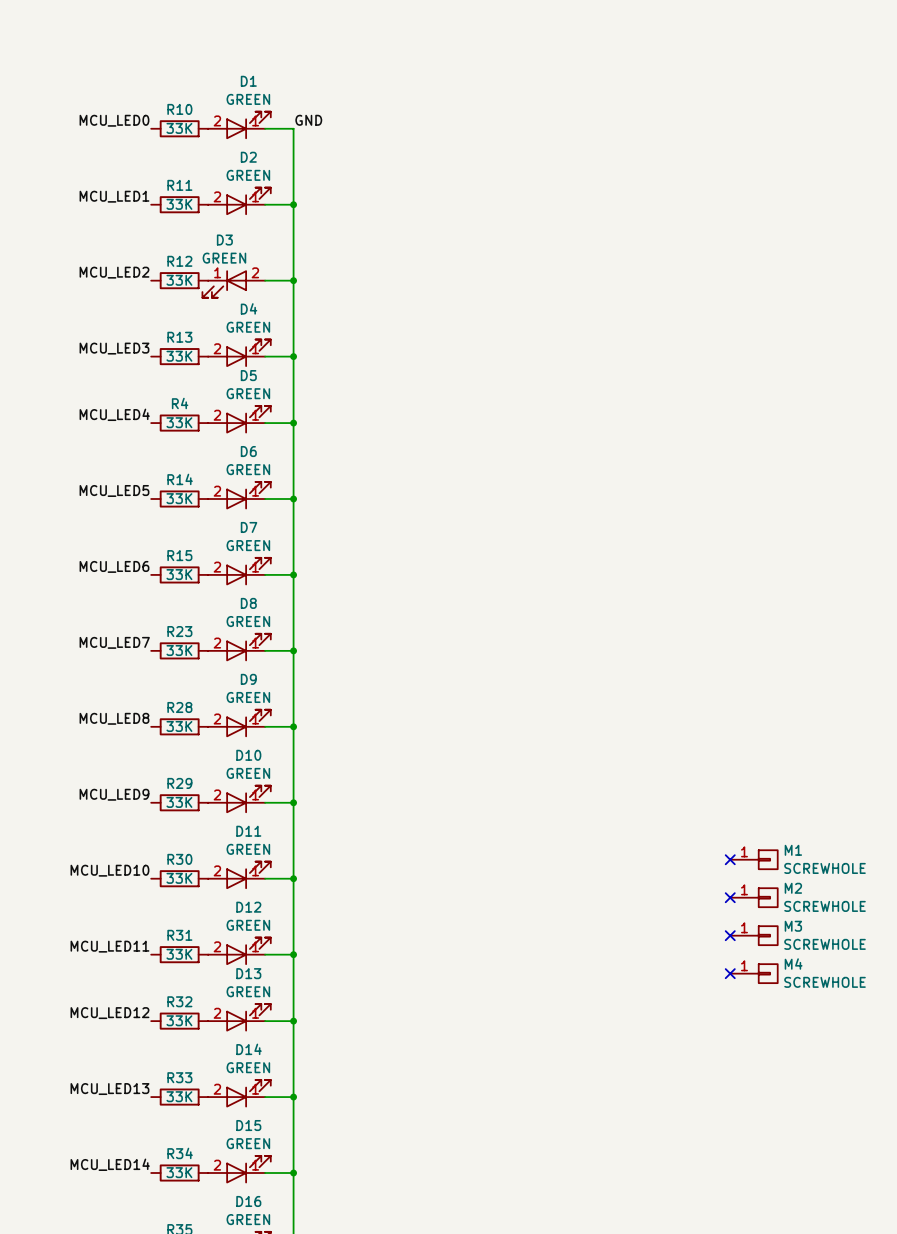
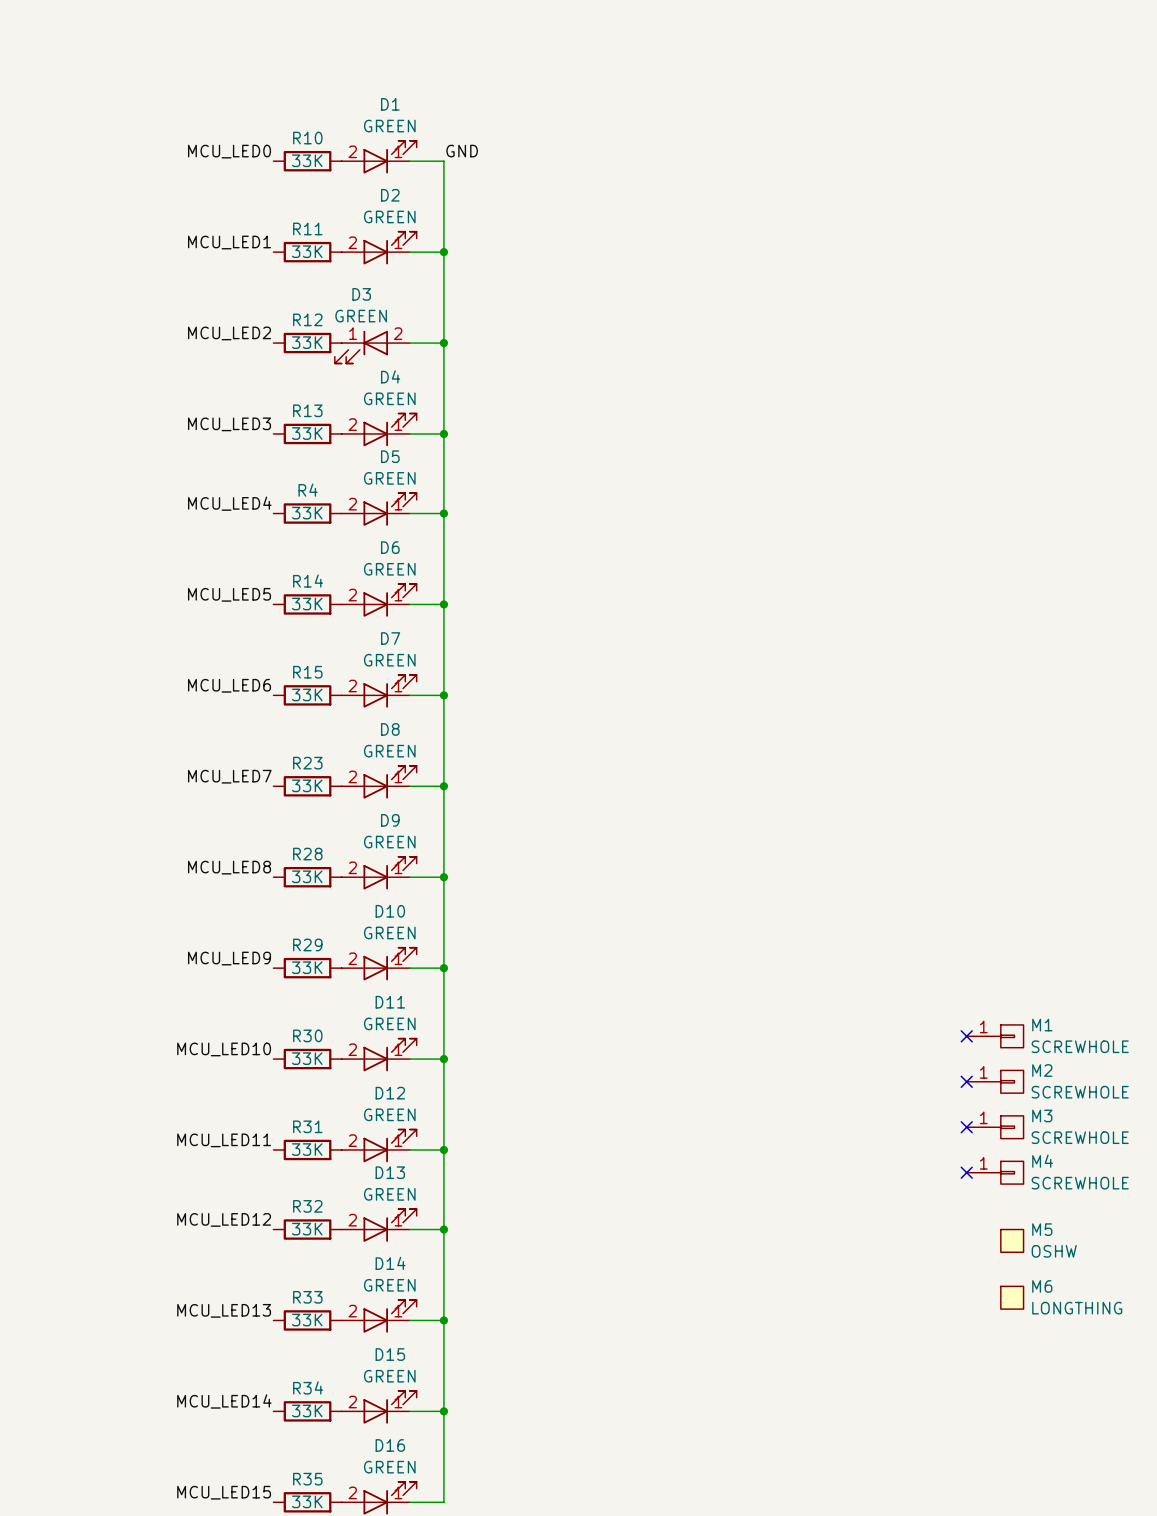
M5: none -> OSHW (1012, 1240)
M6: none -> LONGTHING (1012, 1297)

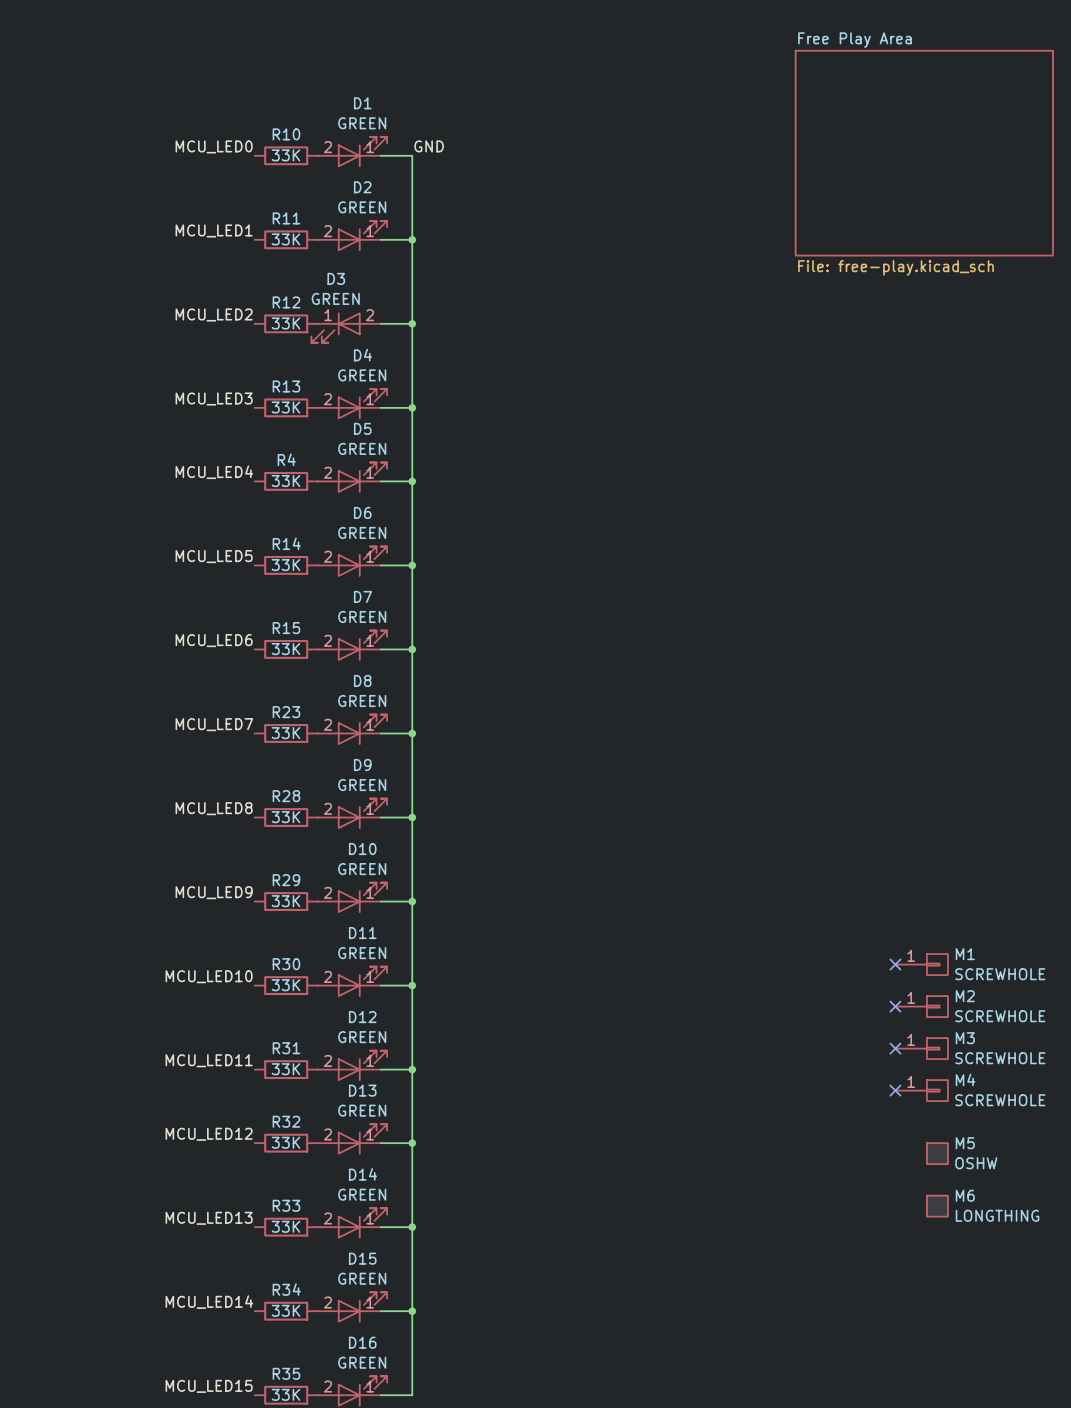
sheet Free Play Area: none -> File: free-play.kicad_sch (924, 153)

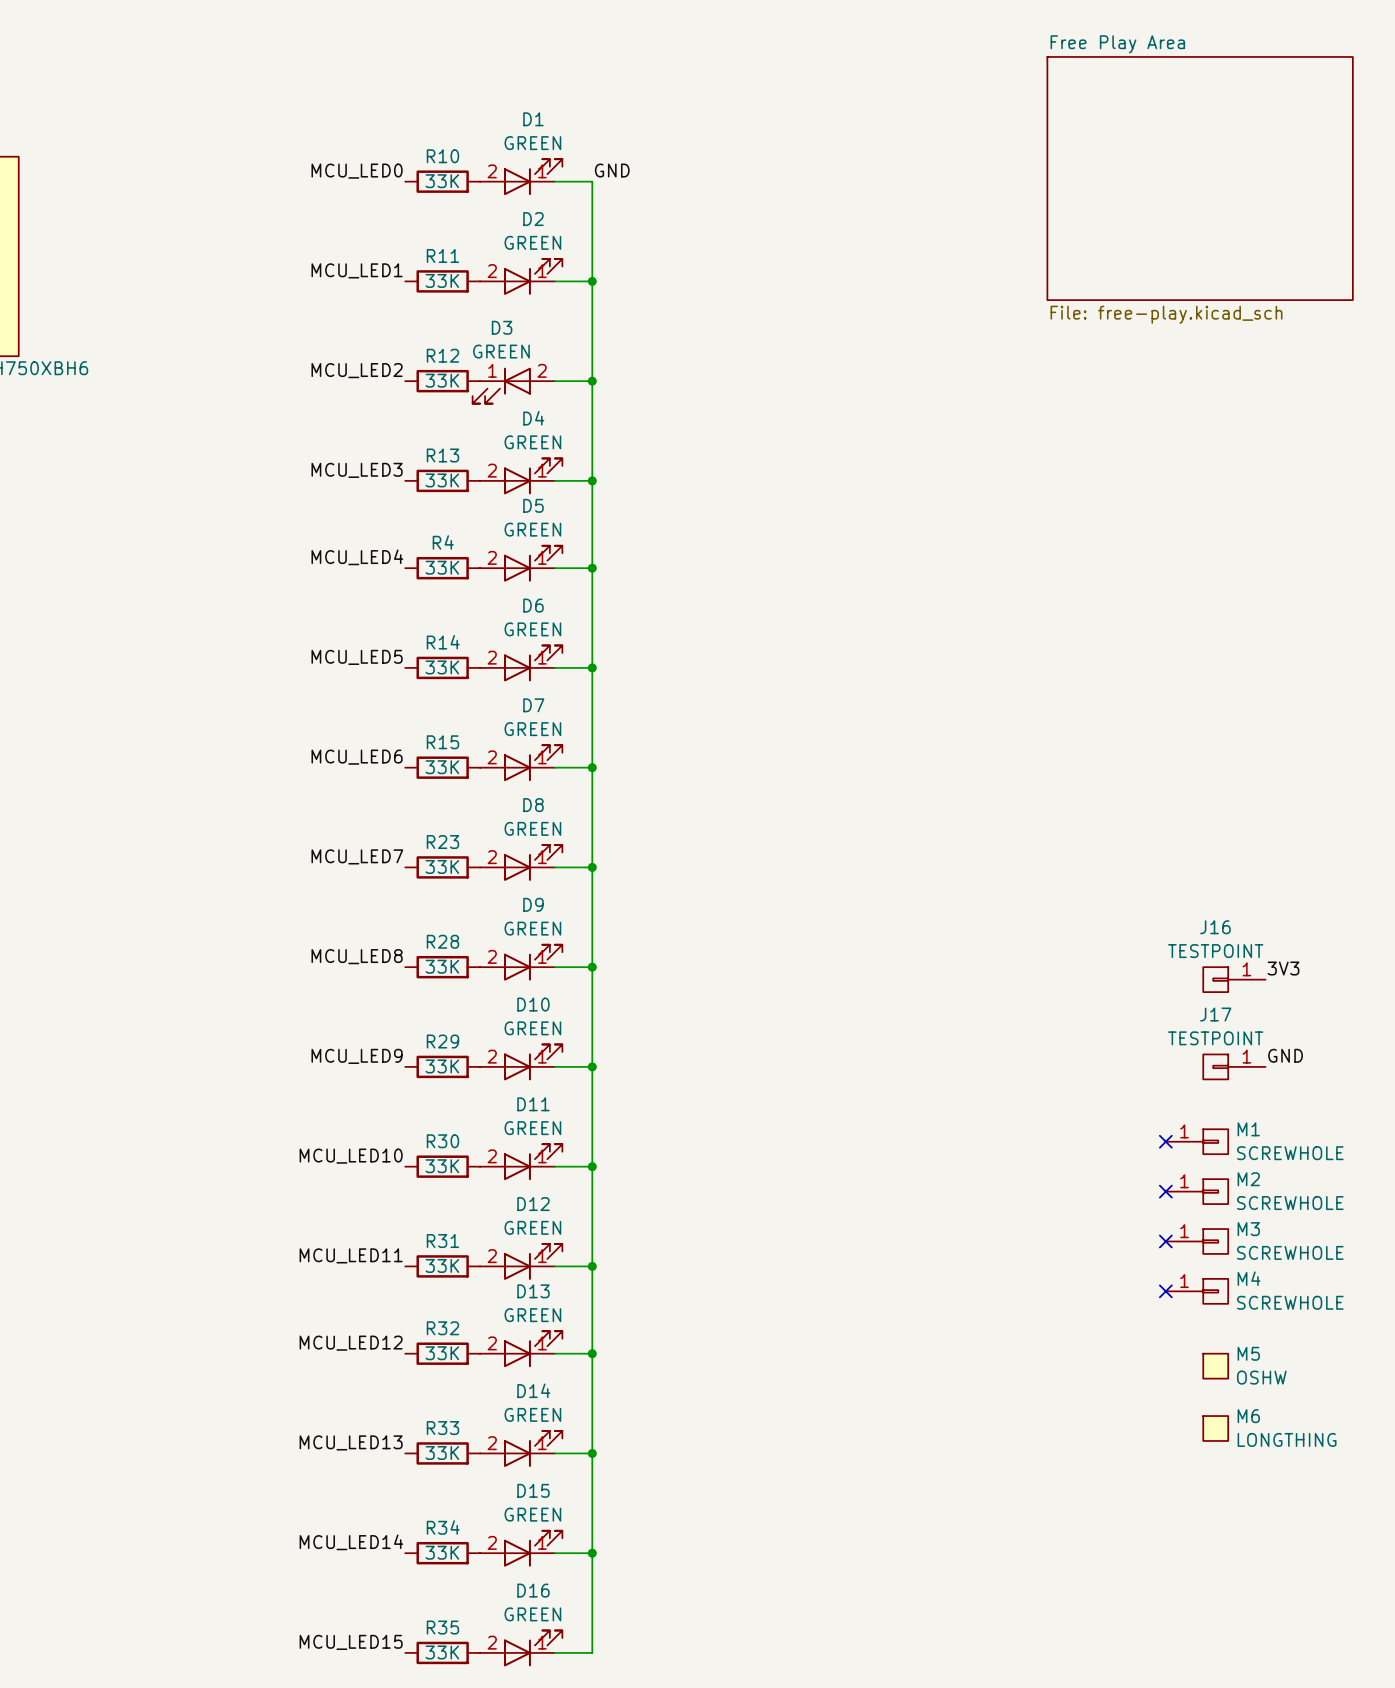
label: none -> 3V3 (1283, 968)
J16: none -> TESTPOINT (1234, 979)
label: none -> GND (1285, 1055)
J17: none -> TESTPOINT (1234, 1066)

